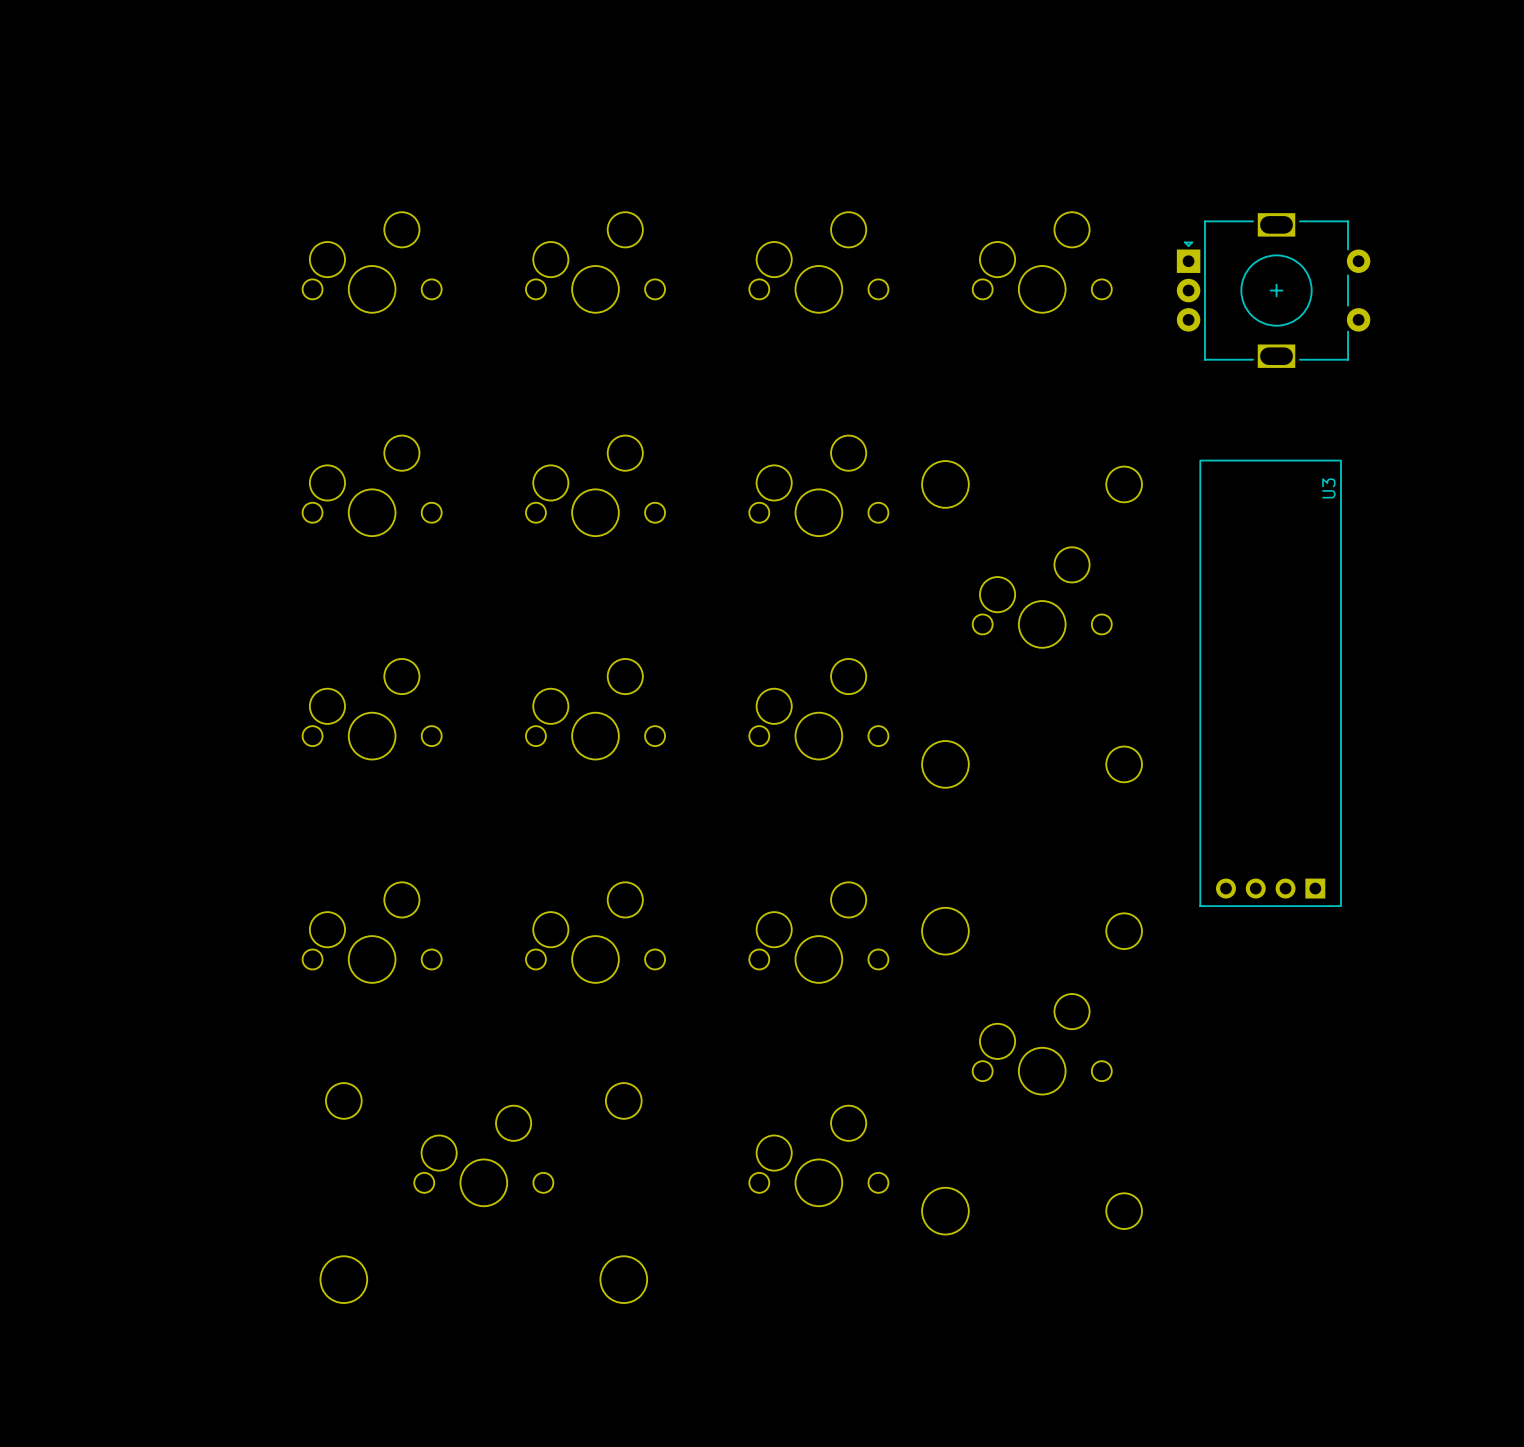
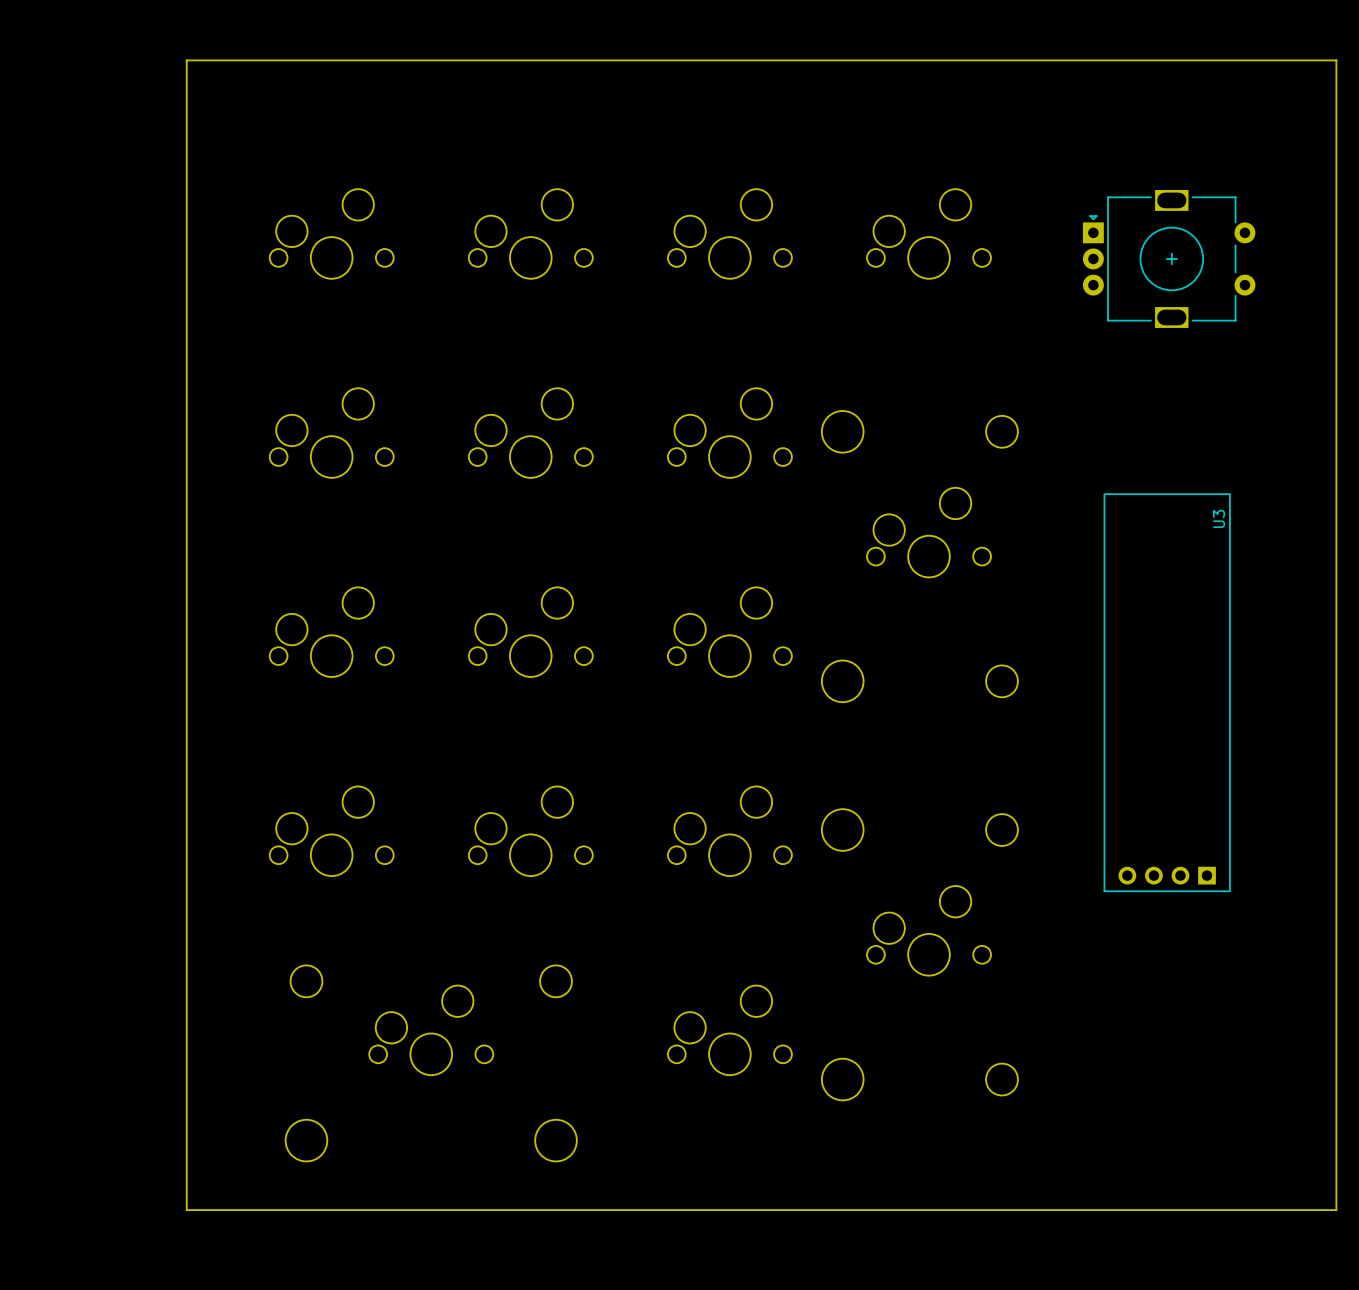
board edge: none -> (186, 60) (1336, 60) (1336, 1210) (186, 1210) (186, 60)
part position: (1273, 290) -> (1169, 258)
U3 position: (1270, 683) -> (1167, 692)

